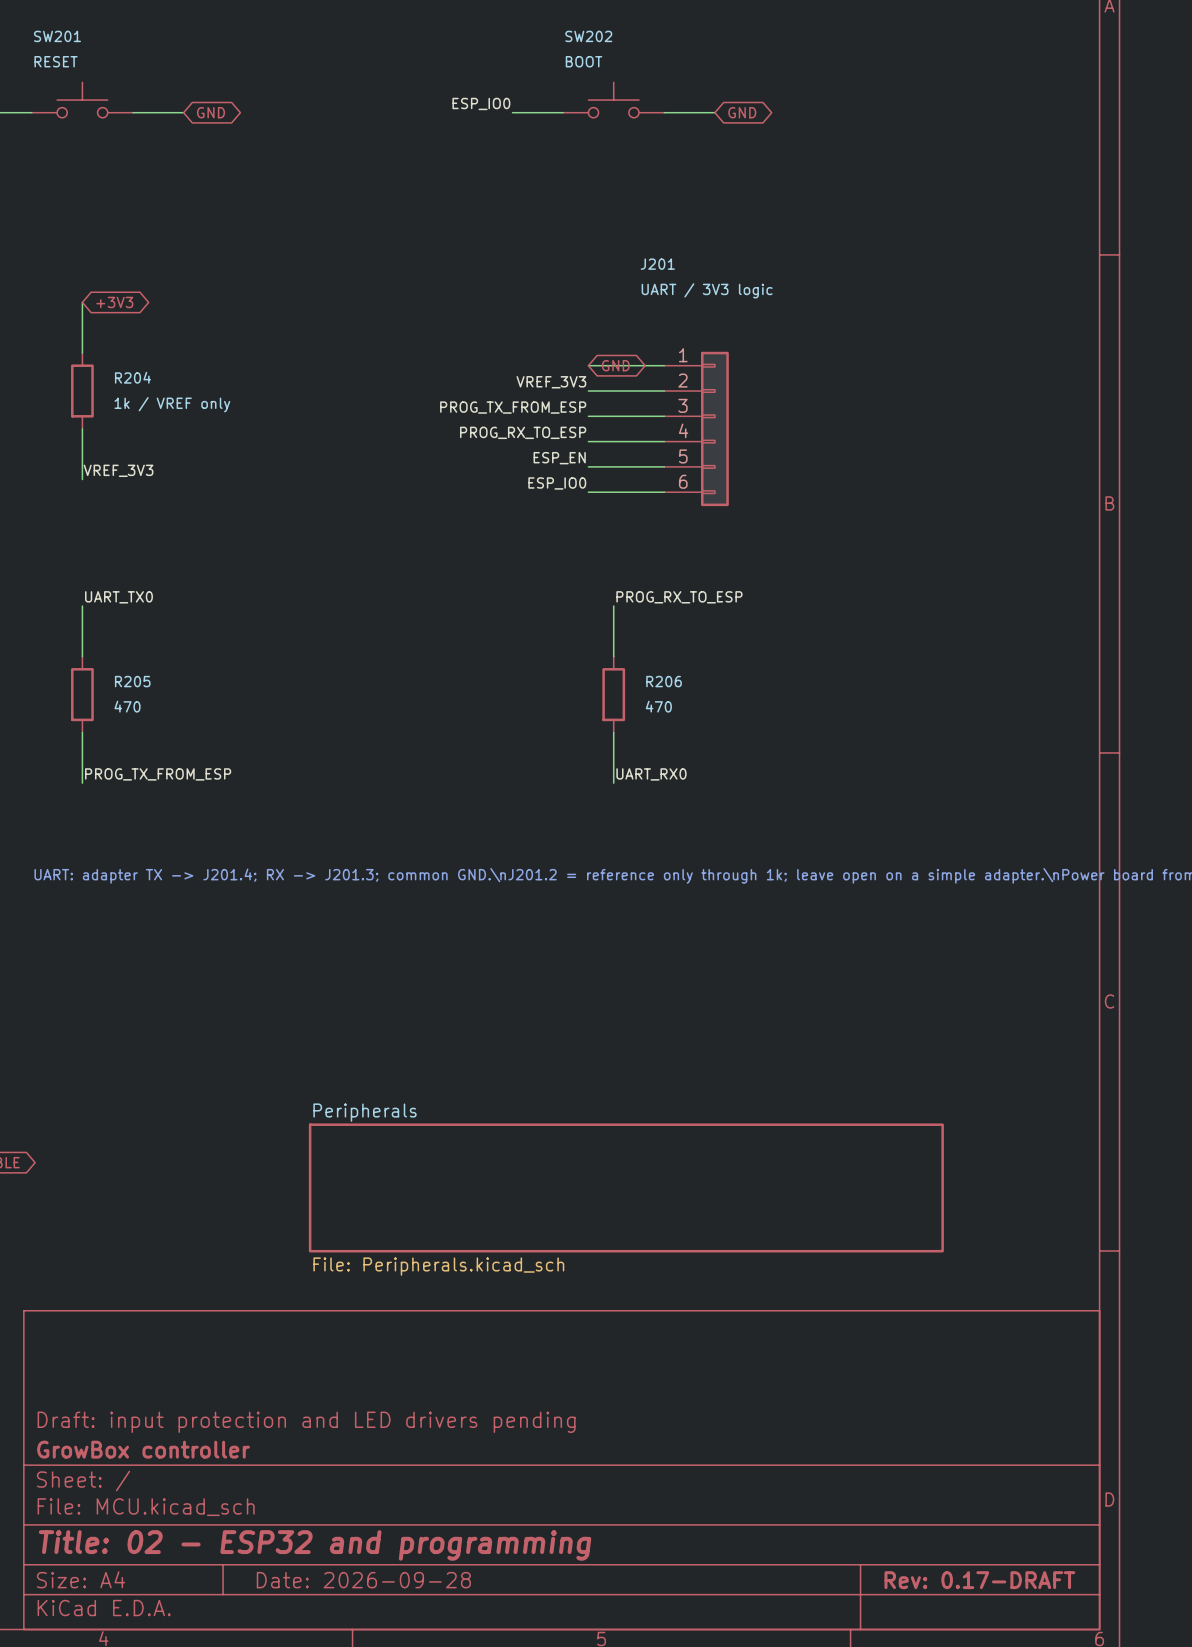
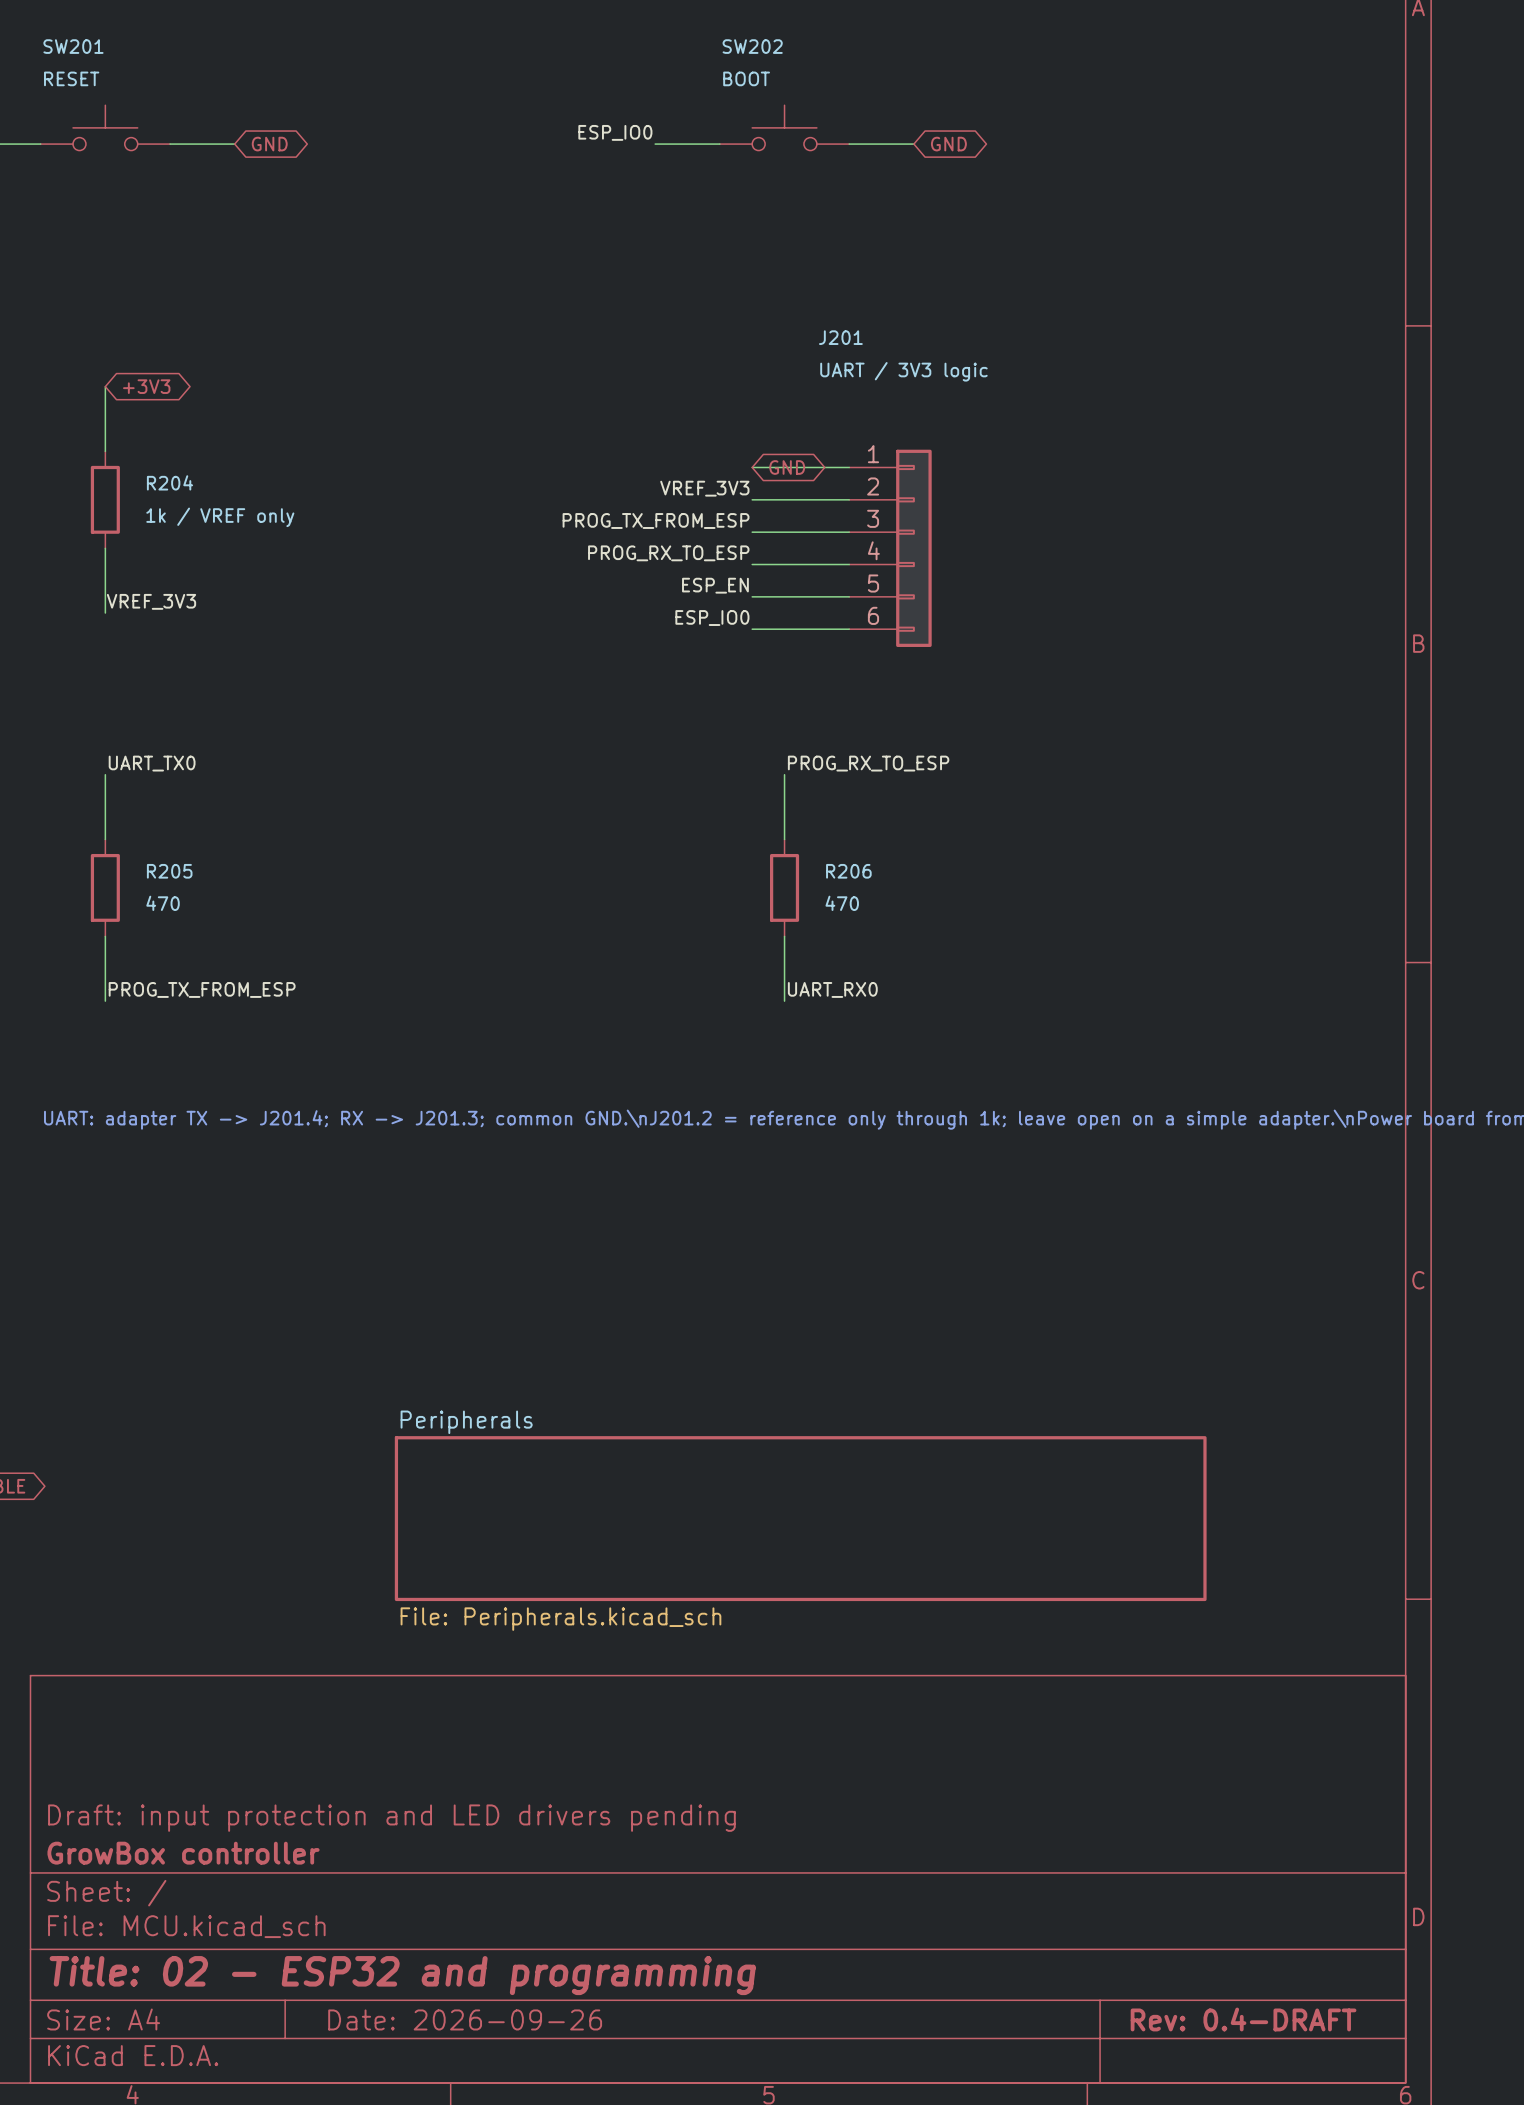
title block: Date: 2026-09-28 (363, 1580) -> Date: 2026-09-26 (465, 2019)
title block: Rev: 0.17-DRAFT (979, 1580) -> Rev: 0.4-DRAFT (1243, 2019)

